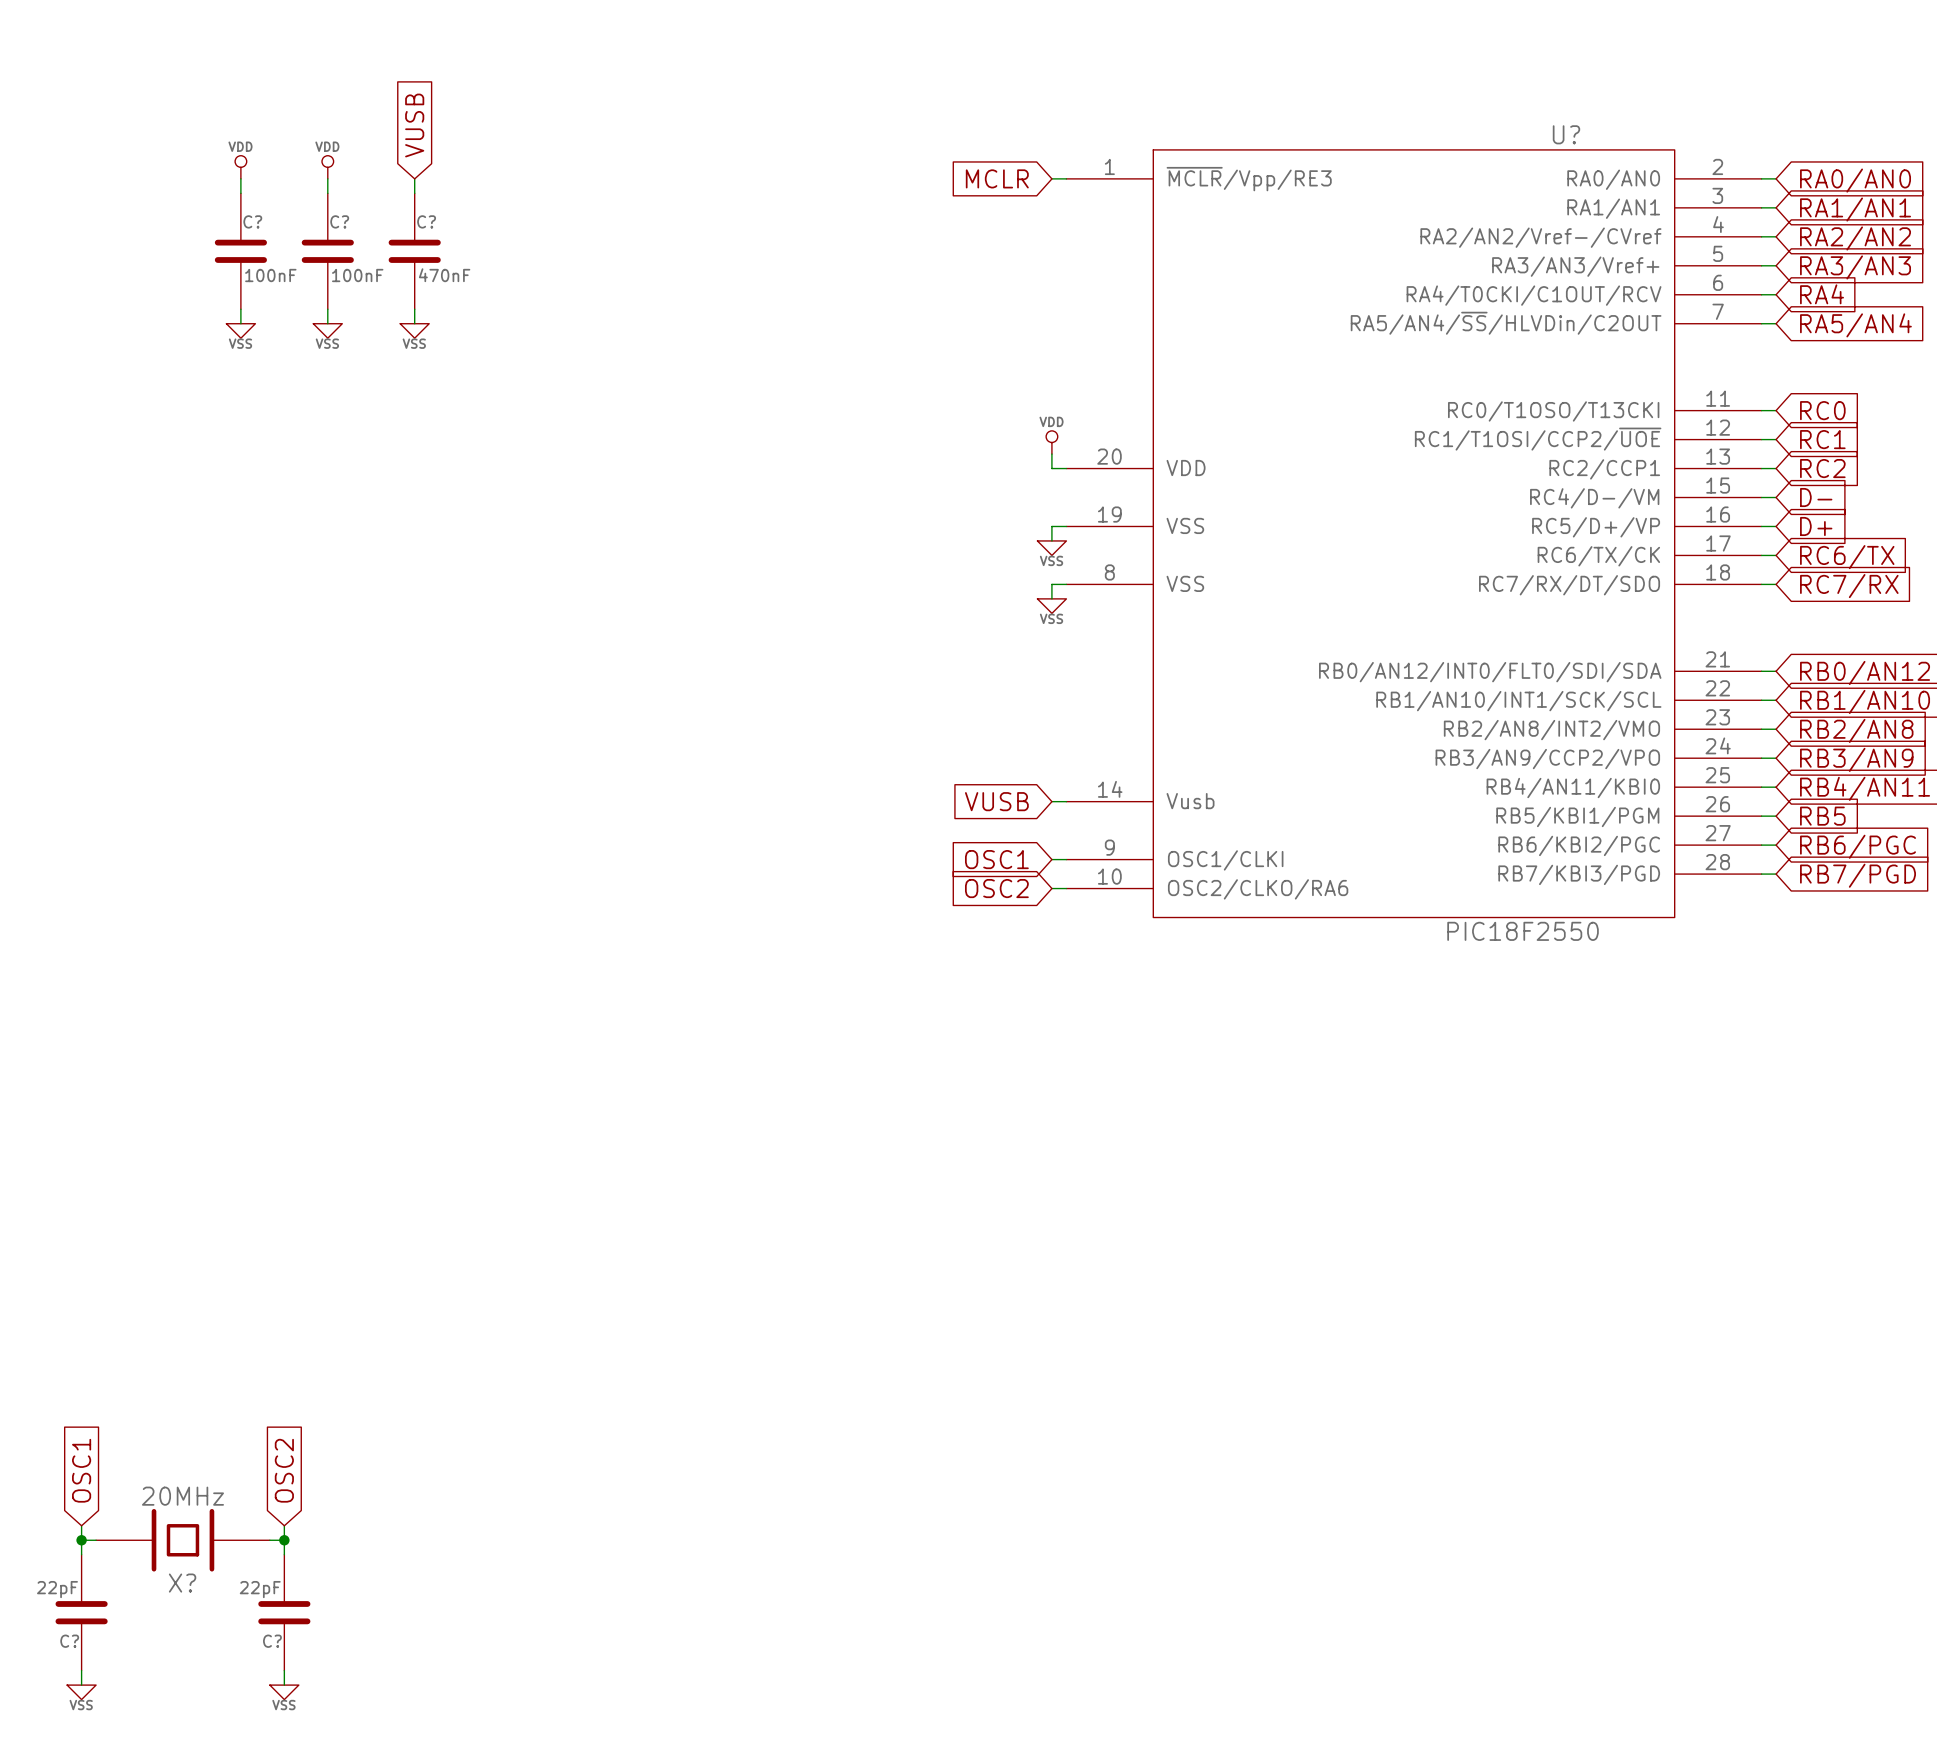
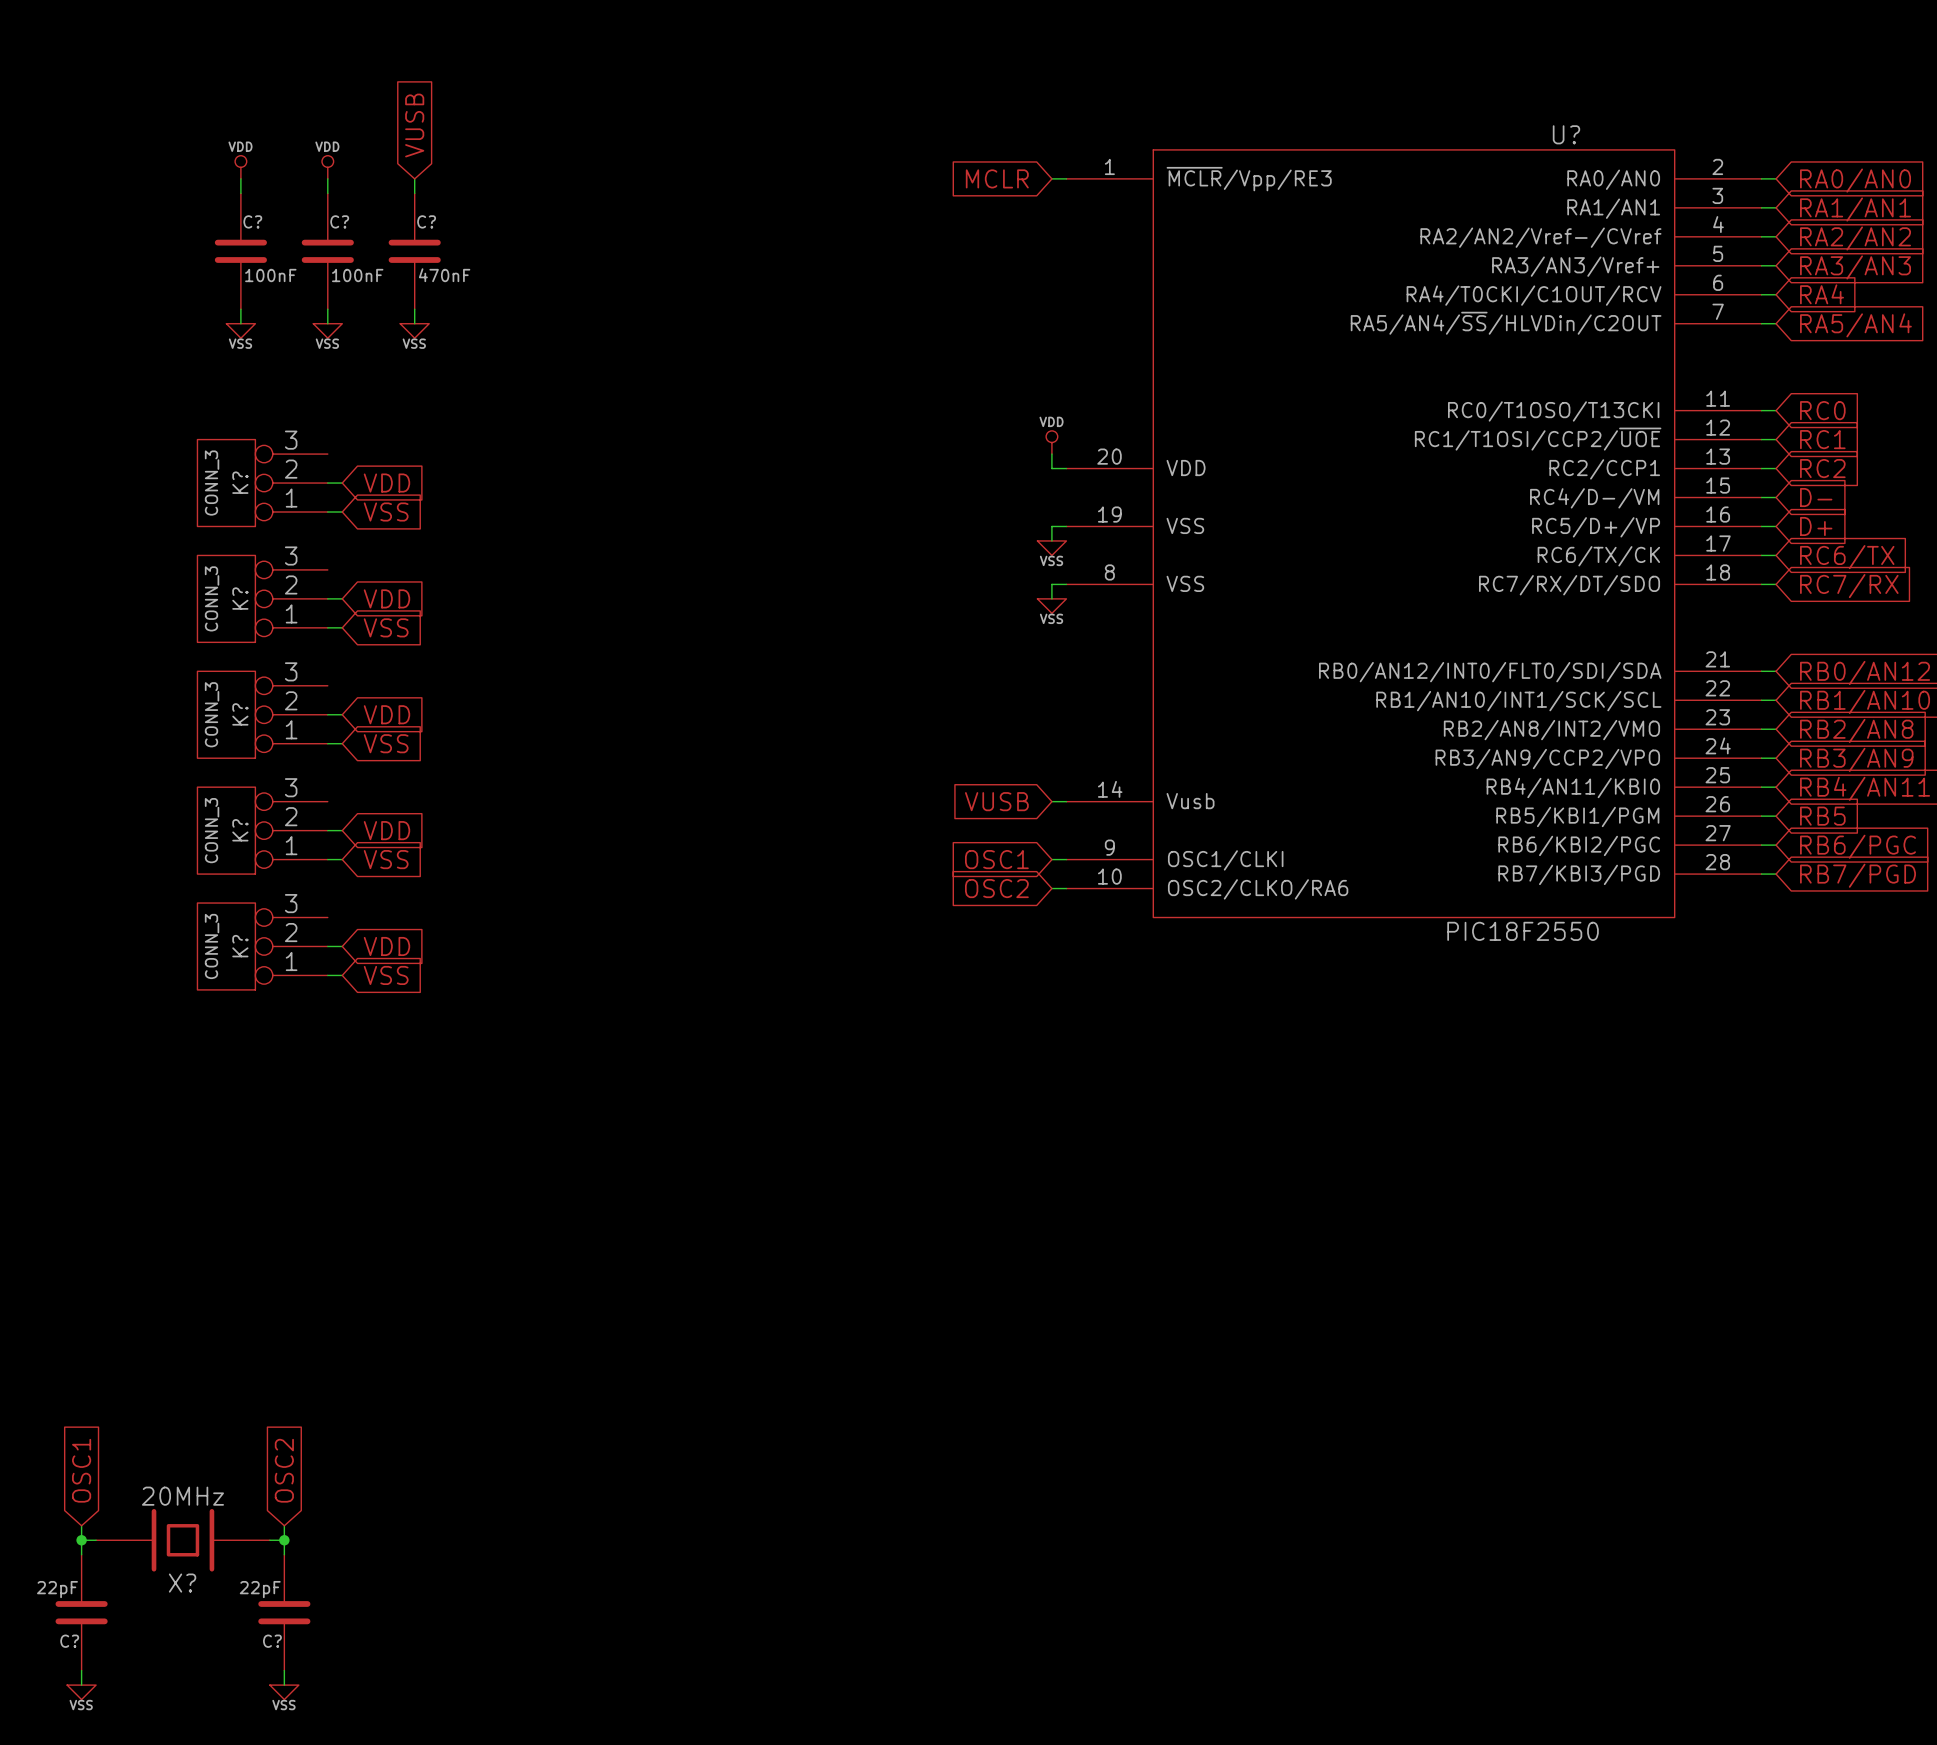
K?: none -> CONN_3 (262, 483)
wire: none -> (327, 483) (342, 483)
global label: none -> VDD (386, 483)
wire: none -> (327, 512) (342, 512)
global label: none -> VSS (386, 512)
K?: none -> CONN_3 (262, 598)
wire: none -> (327, 598) (342, 598)
global label: none -> VDD (386, 598)
wire: none -> (327, 627) (342, 627)
global label: none -> VSS (386, 627)
K?: none -> CONN_3 (262, 714)
wire: none -> (327, 714) (342, 714)
global label: none -> VDD (386, 714)
wire: none -> (327, 743) (342, 743)
global label: none -> VSS (386, 743)
K?: none -> CONN_3 (262, 830)
wire: none -> (327, 830) (342, 830)
global label: none -> VDD (386, 830)
wire: none -> (327, 859) (342, 859)
global label: none -> VSS (386, 859)
K?: none -> CONN_3 (262, 946)
wire: none -> (327, 946) (342, 946)
global label: none -> VDD (386, 946)
wire: none -> (327, 975) (342, 975)
global label: none -> VSS (386, 975)

